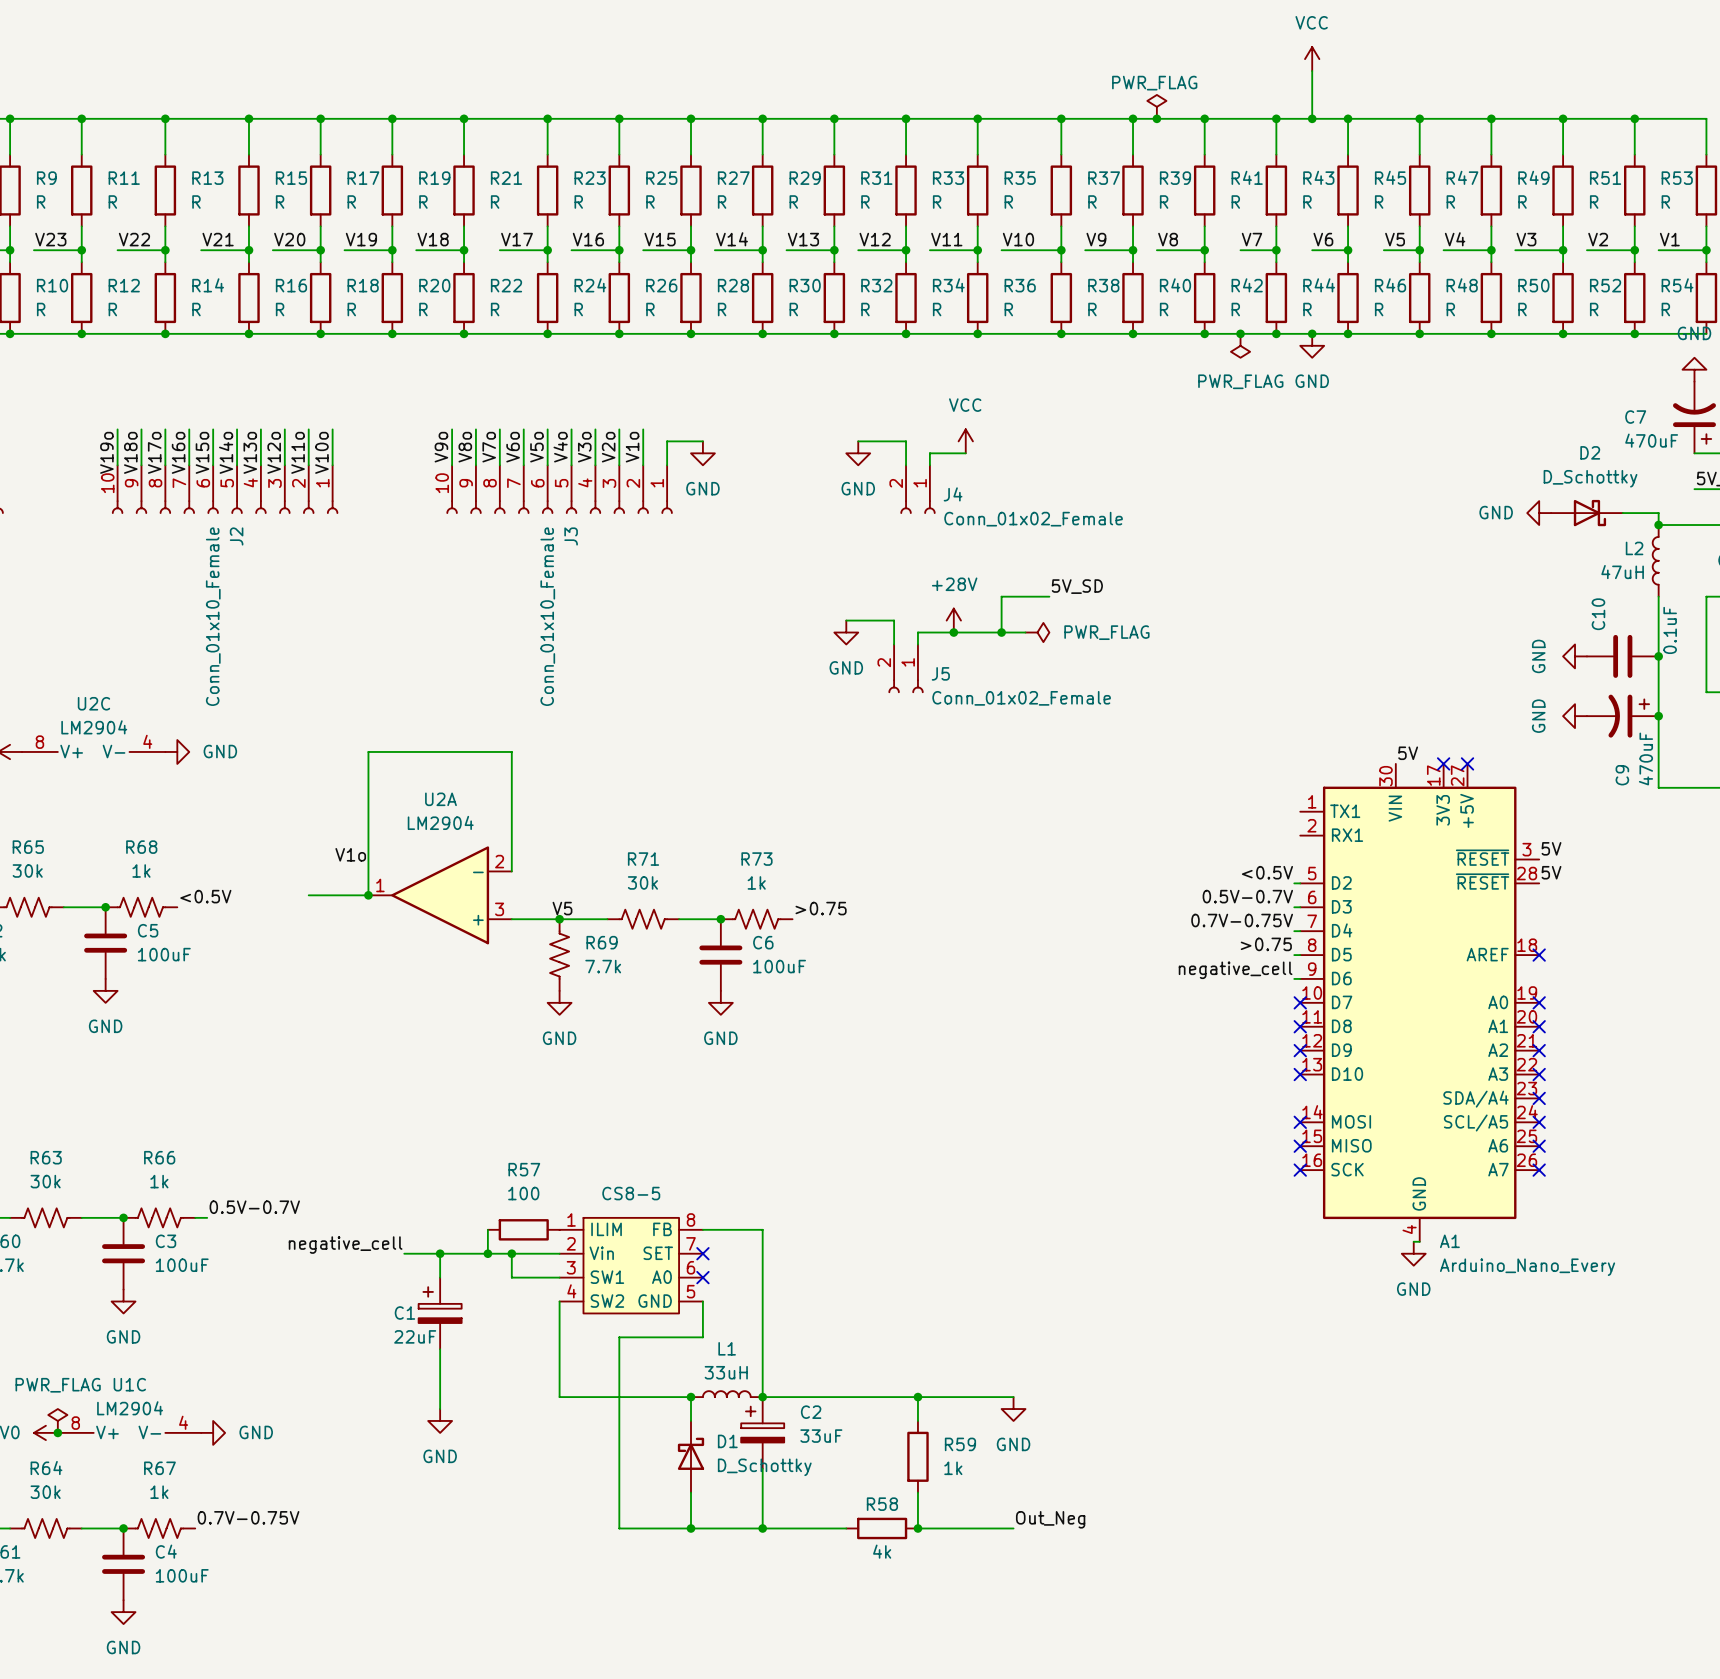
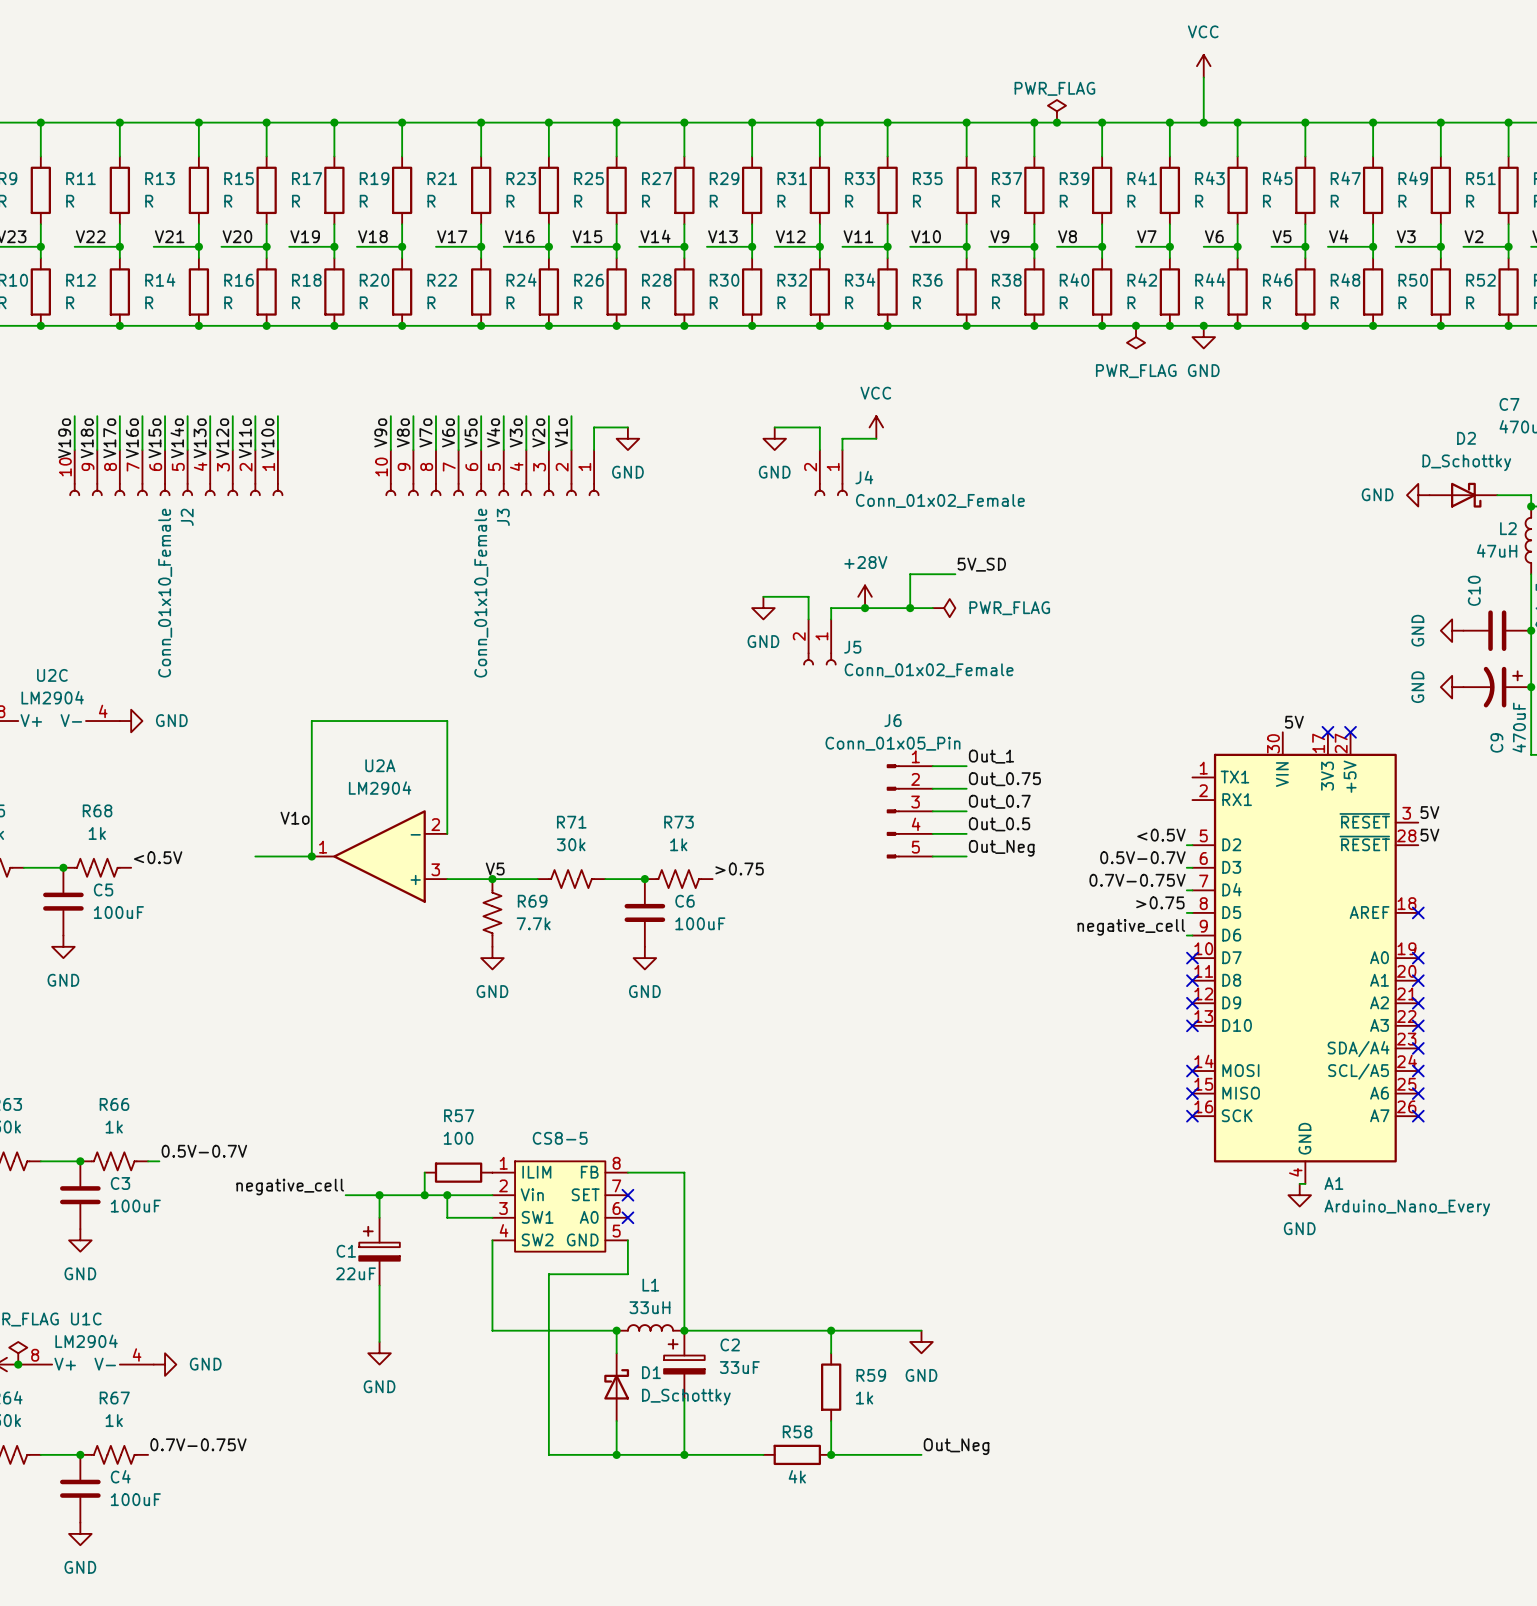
label: none -> Out_1 (991, 756)
wire: none -> (932, 766) (966, 766)
label: none -> Out_0.75 (1004, 779)
wire: none -> (932, 788) (966, 788)
label: none -> Out_0.7 (999, 801)
J6: none -> Conn_01x05_Pin (909, 811)
wire: none -> (932, 811) (966, 811)
label: none -> Out_0.5 (999, 824)
wire: none -> (932, 833) (966, 833)
label: none -> Out_Neg (1001, 848)
wire: none -> (932, 856) (966, 856)

